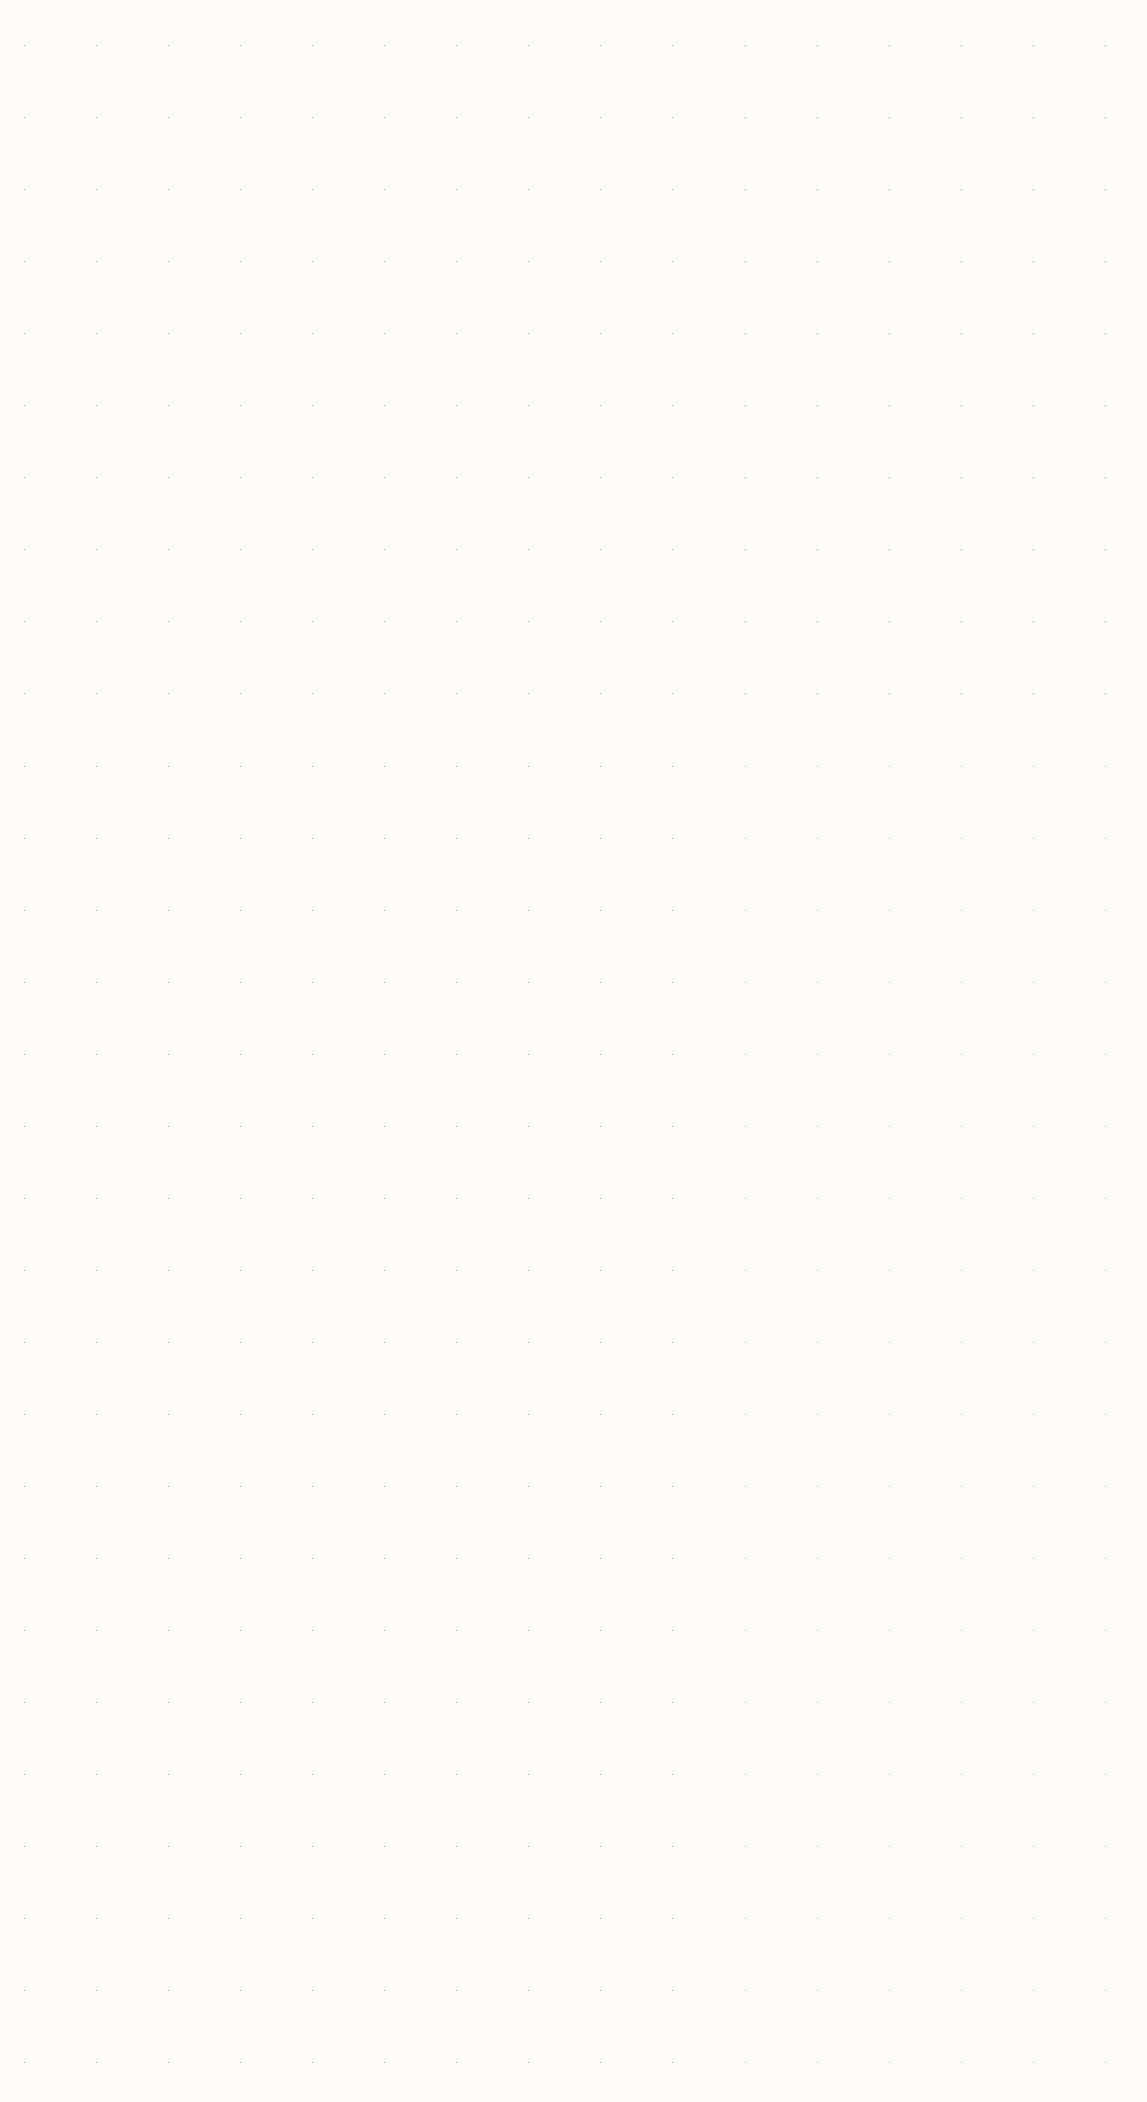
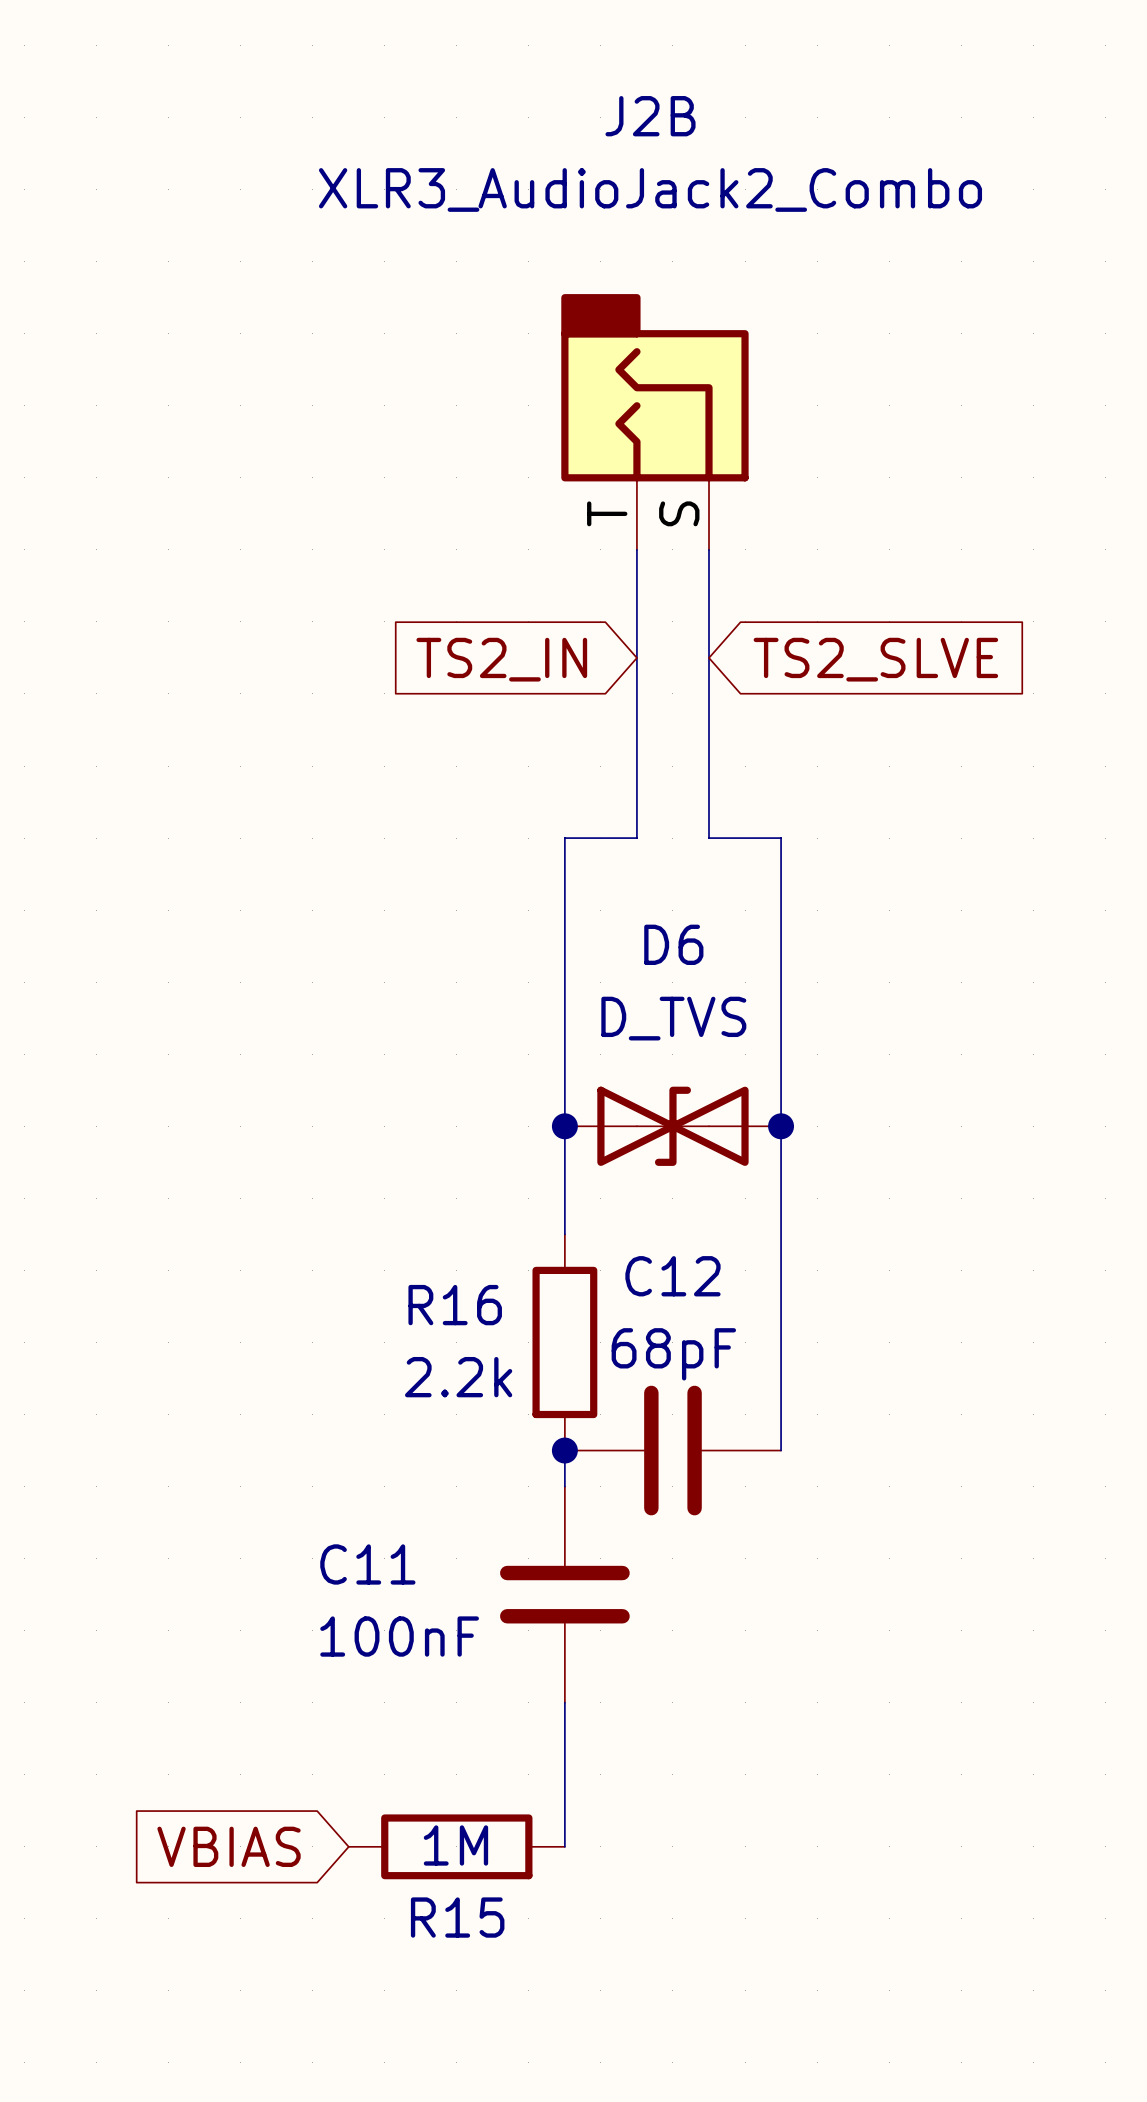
J2B: none -> XLR3_AudioJack2_Combo (654, 421)
wire: none -> (636, 549) (636, 838) (564, 838) (564, 1234)
wire: none -> (708, 549) (708, 838) (781, 838) (781, 1450)
global label: none -> TS2_IN (501, 659)
global label: none -> TS2_SLVE (875, 659)
junction: none -> (564, 1126)
D6: none -> D_TVS (672, 1126)
junction: none -> (781, 1126)
R16: none -> 2.2k (564, 1342)
wire: none -> (564, 1450) (564, 1486)
junction: none -> (564, 1450)
C12: none -> 68pF (672, 1450)
C11: none -> 100nF (564, 1594)
wire: none -> (564, 1702) (564, 1846)
global label: none -> VBIAS (229, 1846)
R15: none -> 1M (456, 1846)

